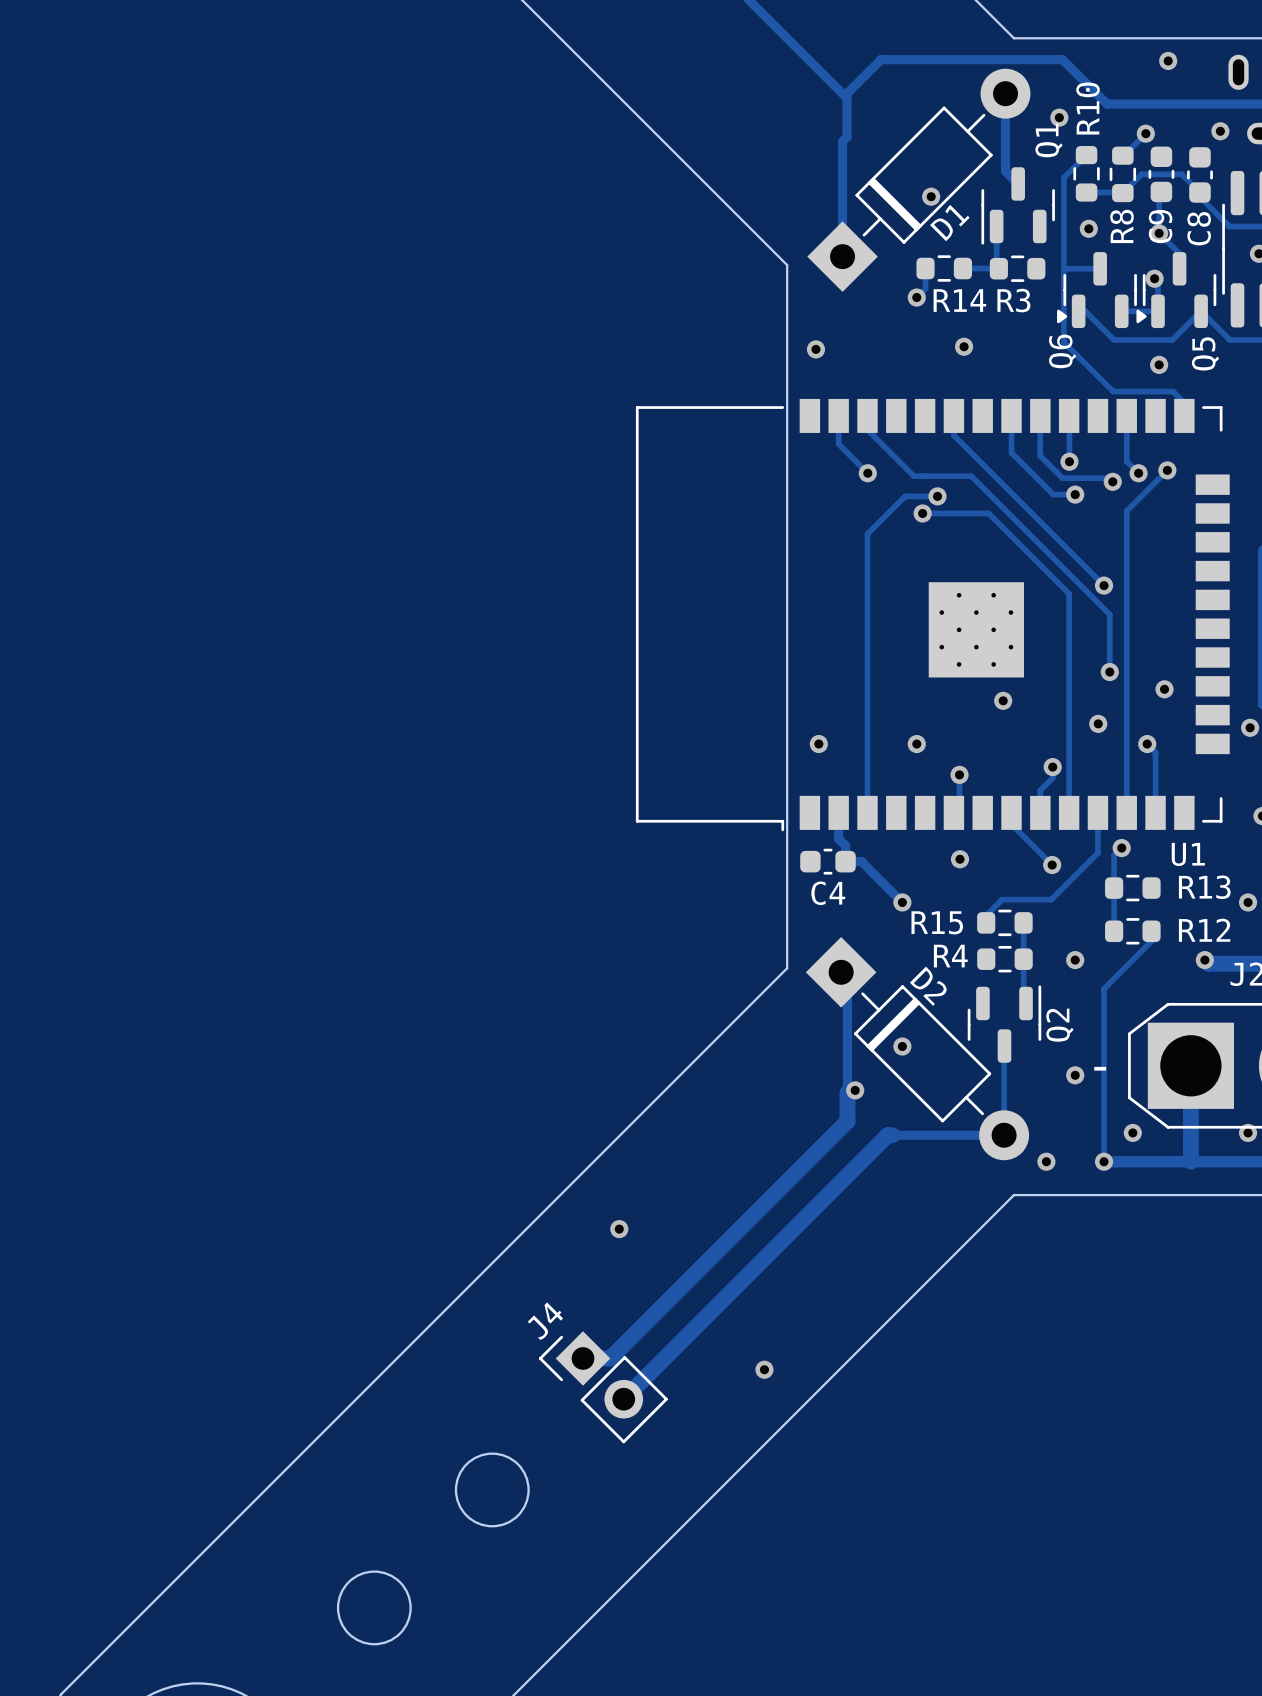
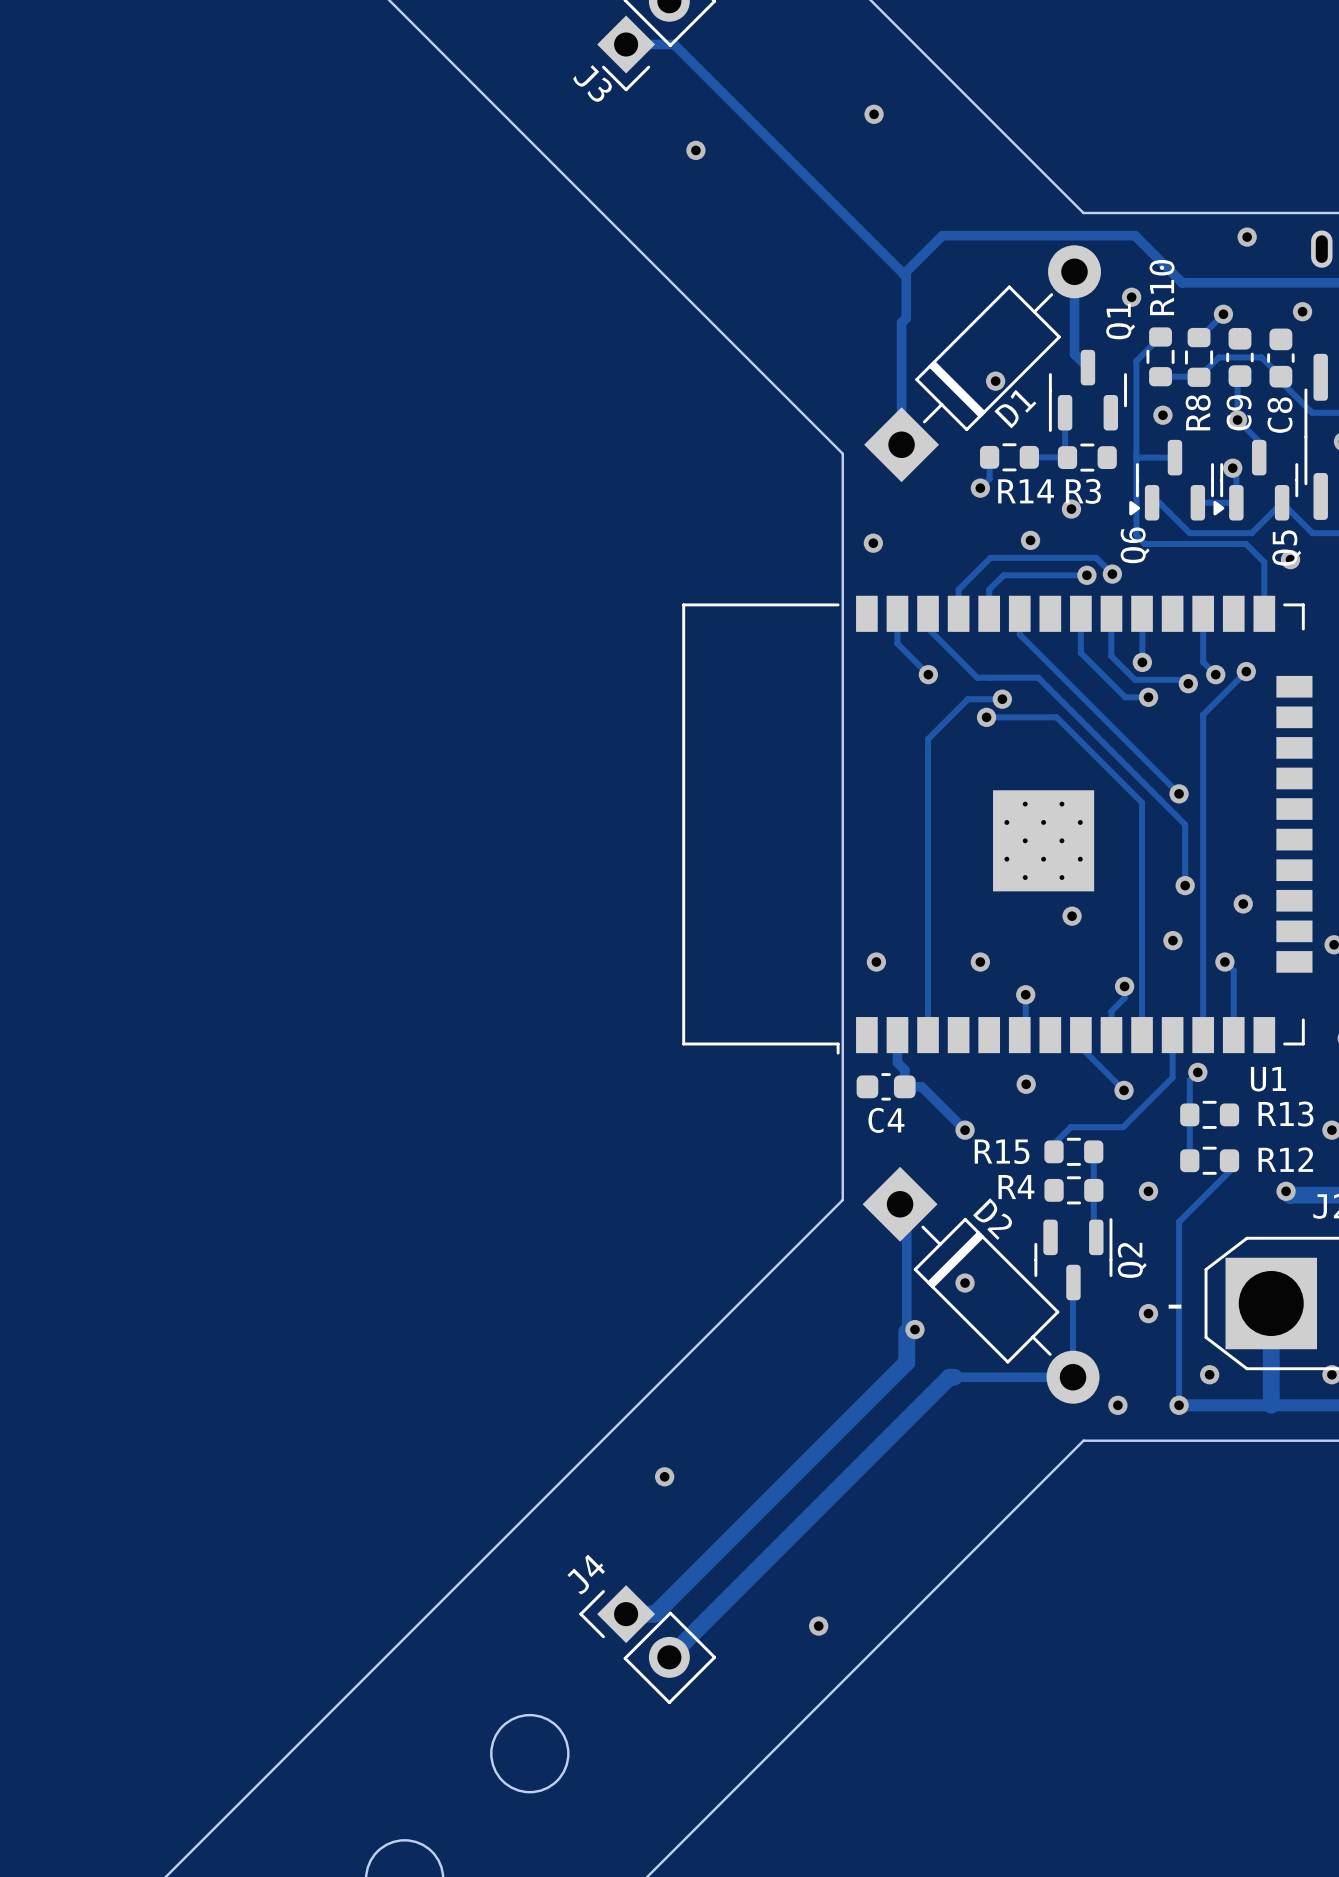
via: none -> (1071, 509)
track: (1071, 350) (1113, 391) (1173, 391) (1184, 402) -> (1144, 544) (1245, 544) (1264, 562) (1264, 599)
via position: (1159, 364) -> (1290, 559)
track: none -> (1112, 574) (1096, 557) (990, 557) (958, 589) (958, 599)
via: none -> (1112, 574)
track: none -> (1086, 575) (1003, 575) (989, 589) (989, 613)
via: none -> (1086, 575)

